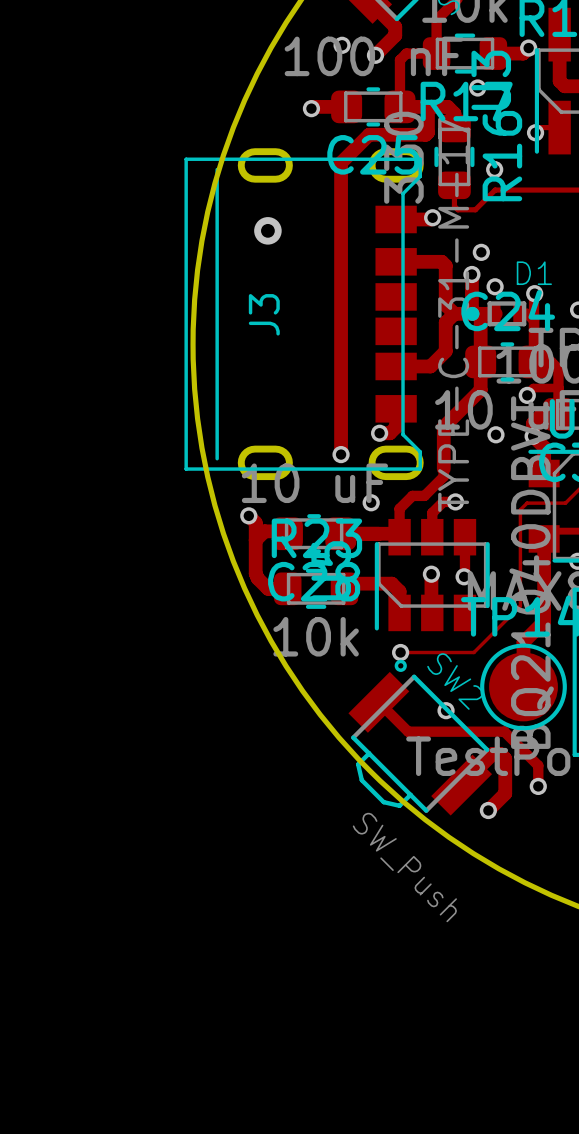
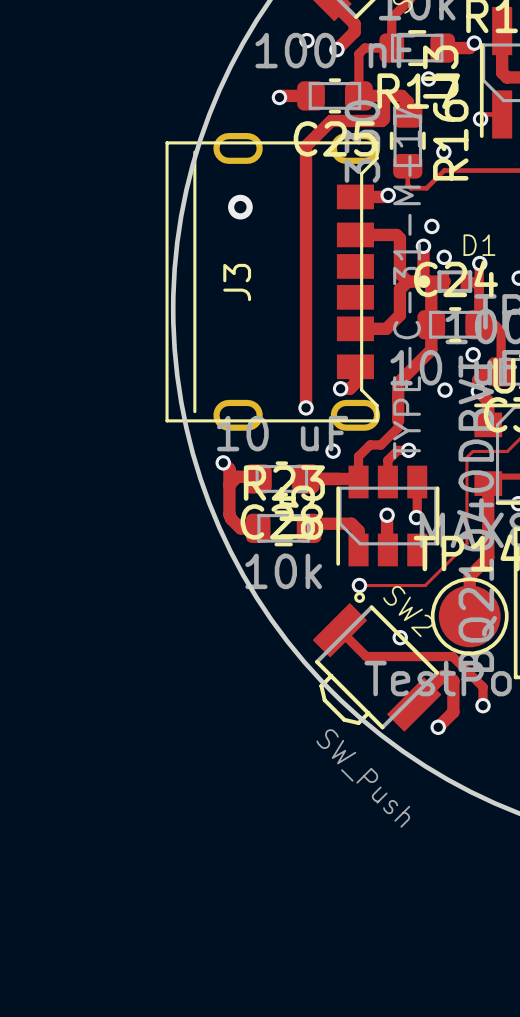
track: (558, 388) (533, 388) (527, 395) -> none

